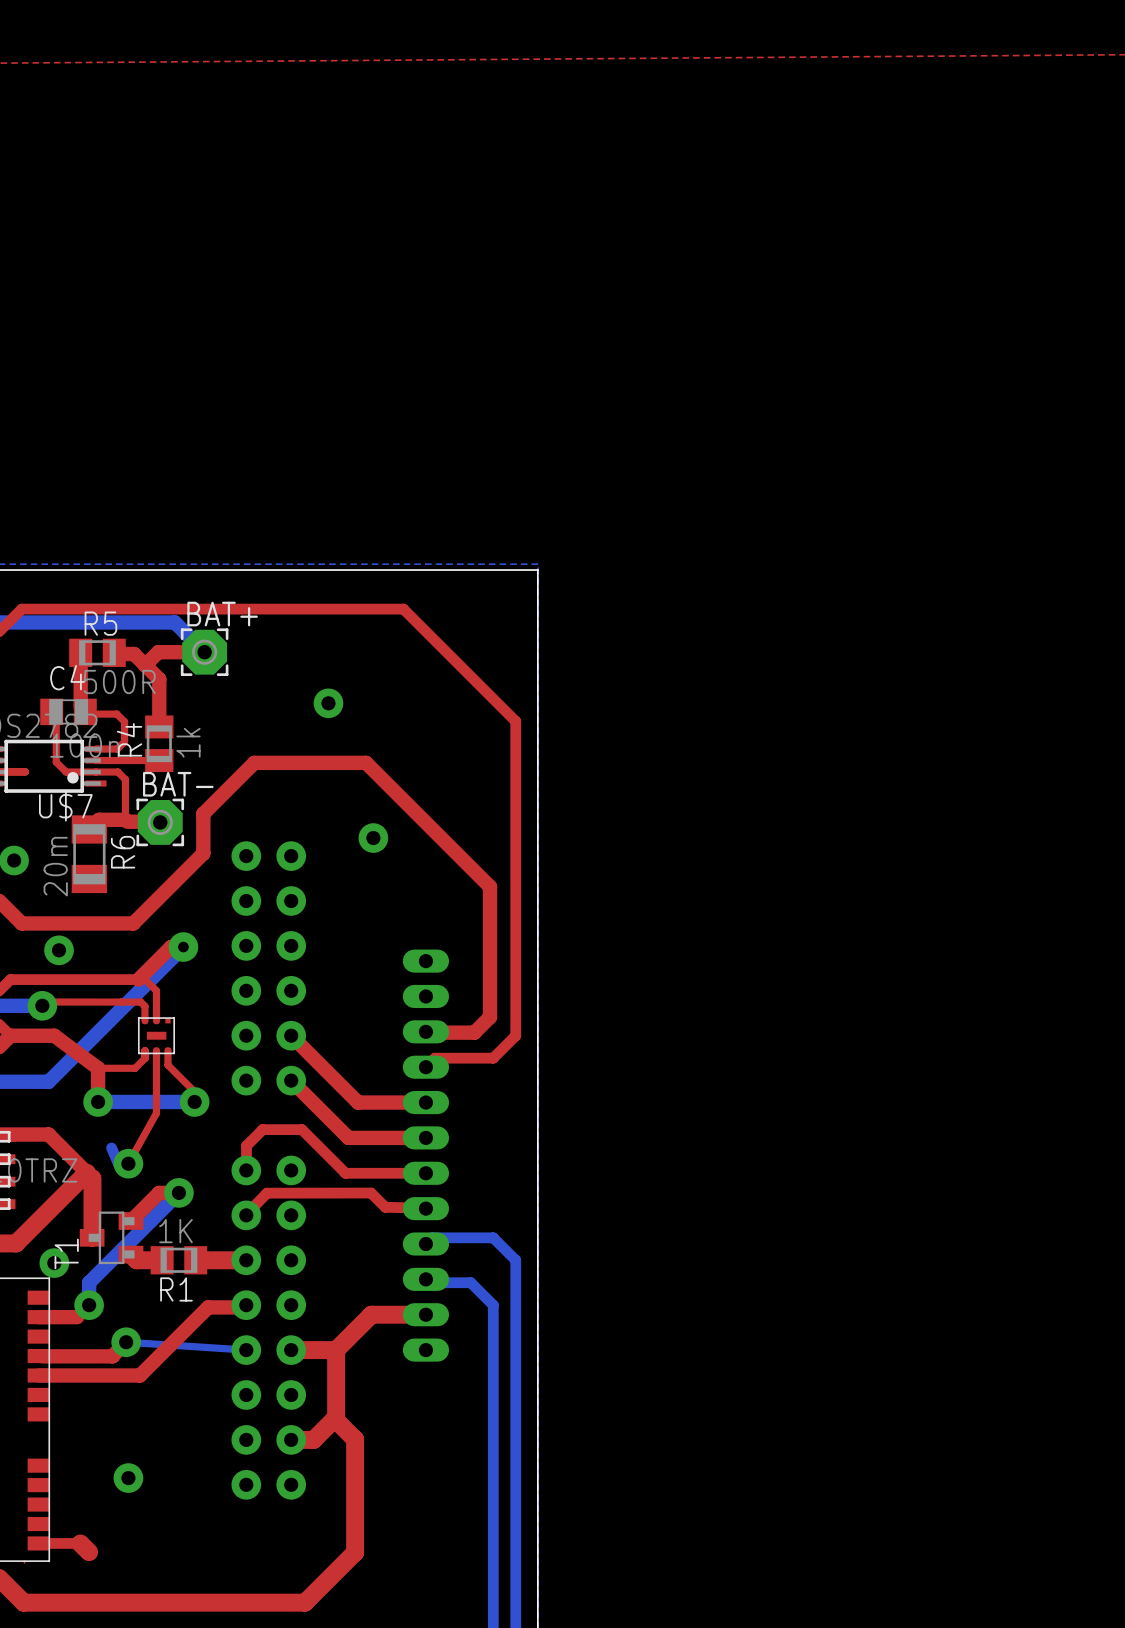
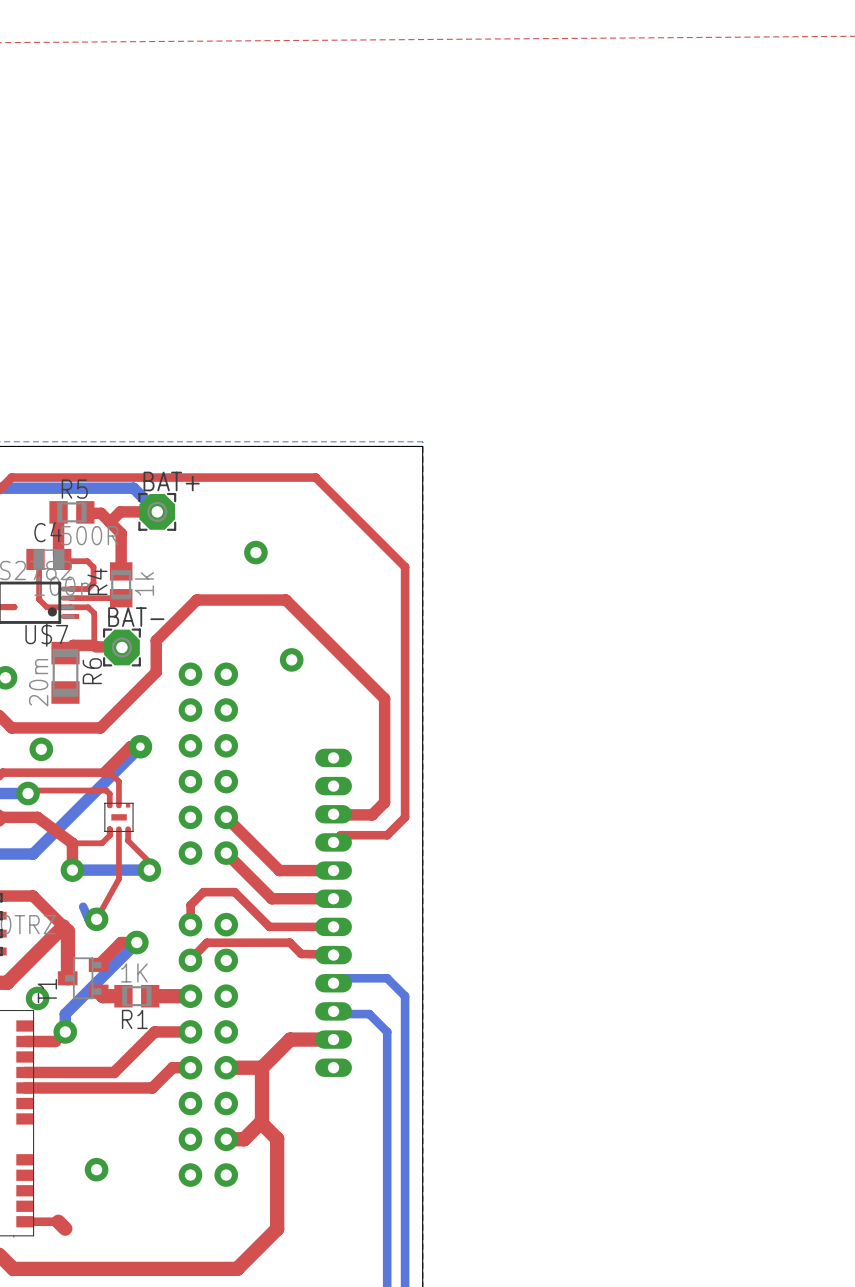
top track: (246, 1305) (244, 1307) (208, 1307) (140, 1375) -> (190, 1067) (172, 1067) (152, 1087) (105, 1087)
top track: (126, 1342) (112, 1356) (38, 1356) -> (190, 1031) (154, 1031) (114, 1072) (25, 1072)
bottom track: (126, 1342) (246, 1350) -> none
via: (126, 1342) -> none

